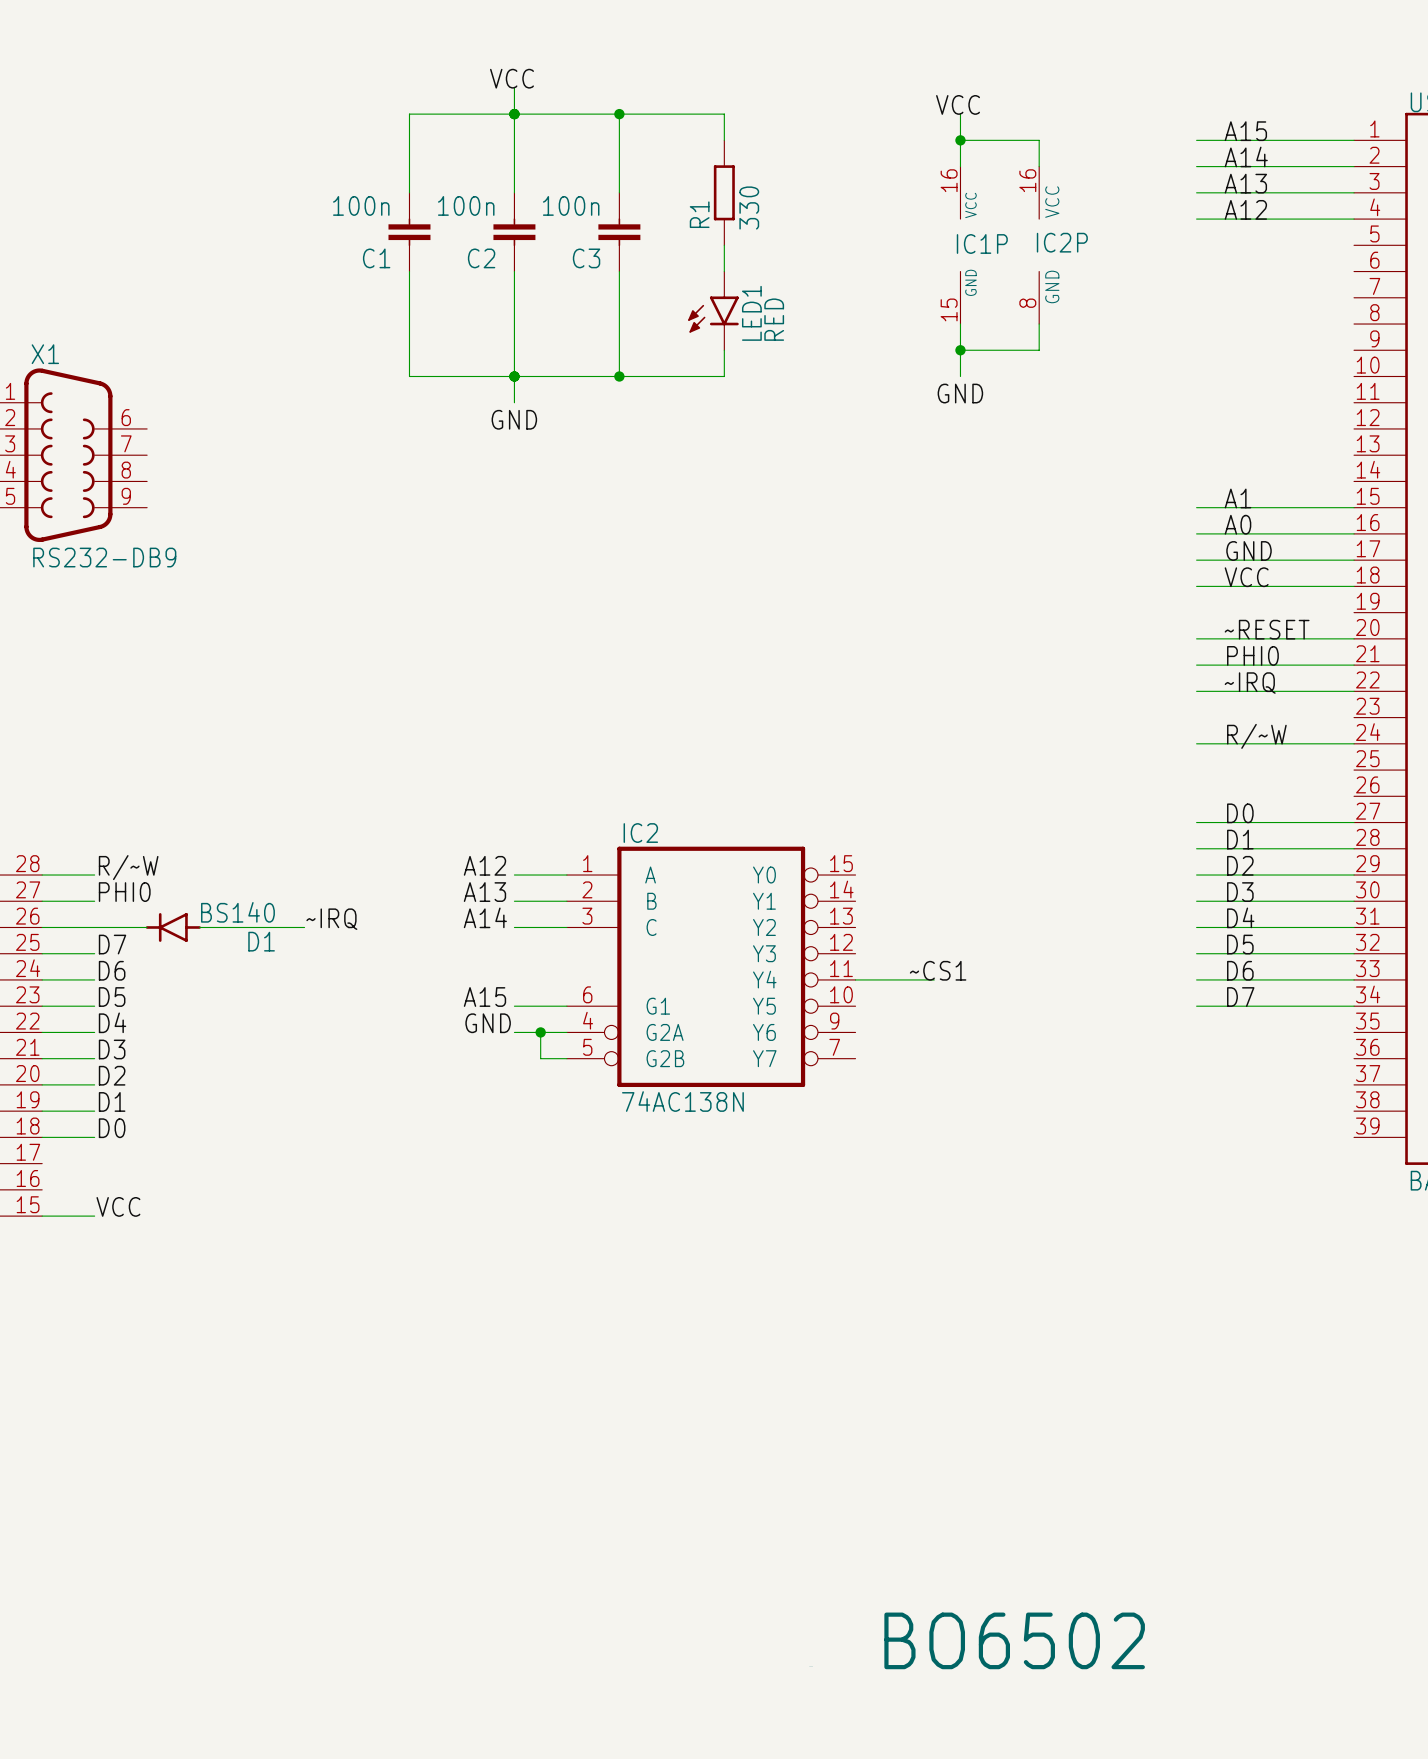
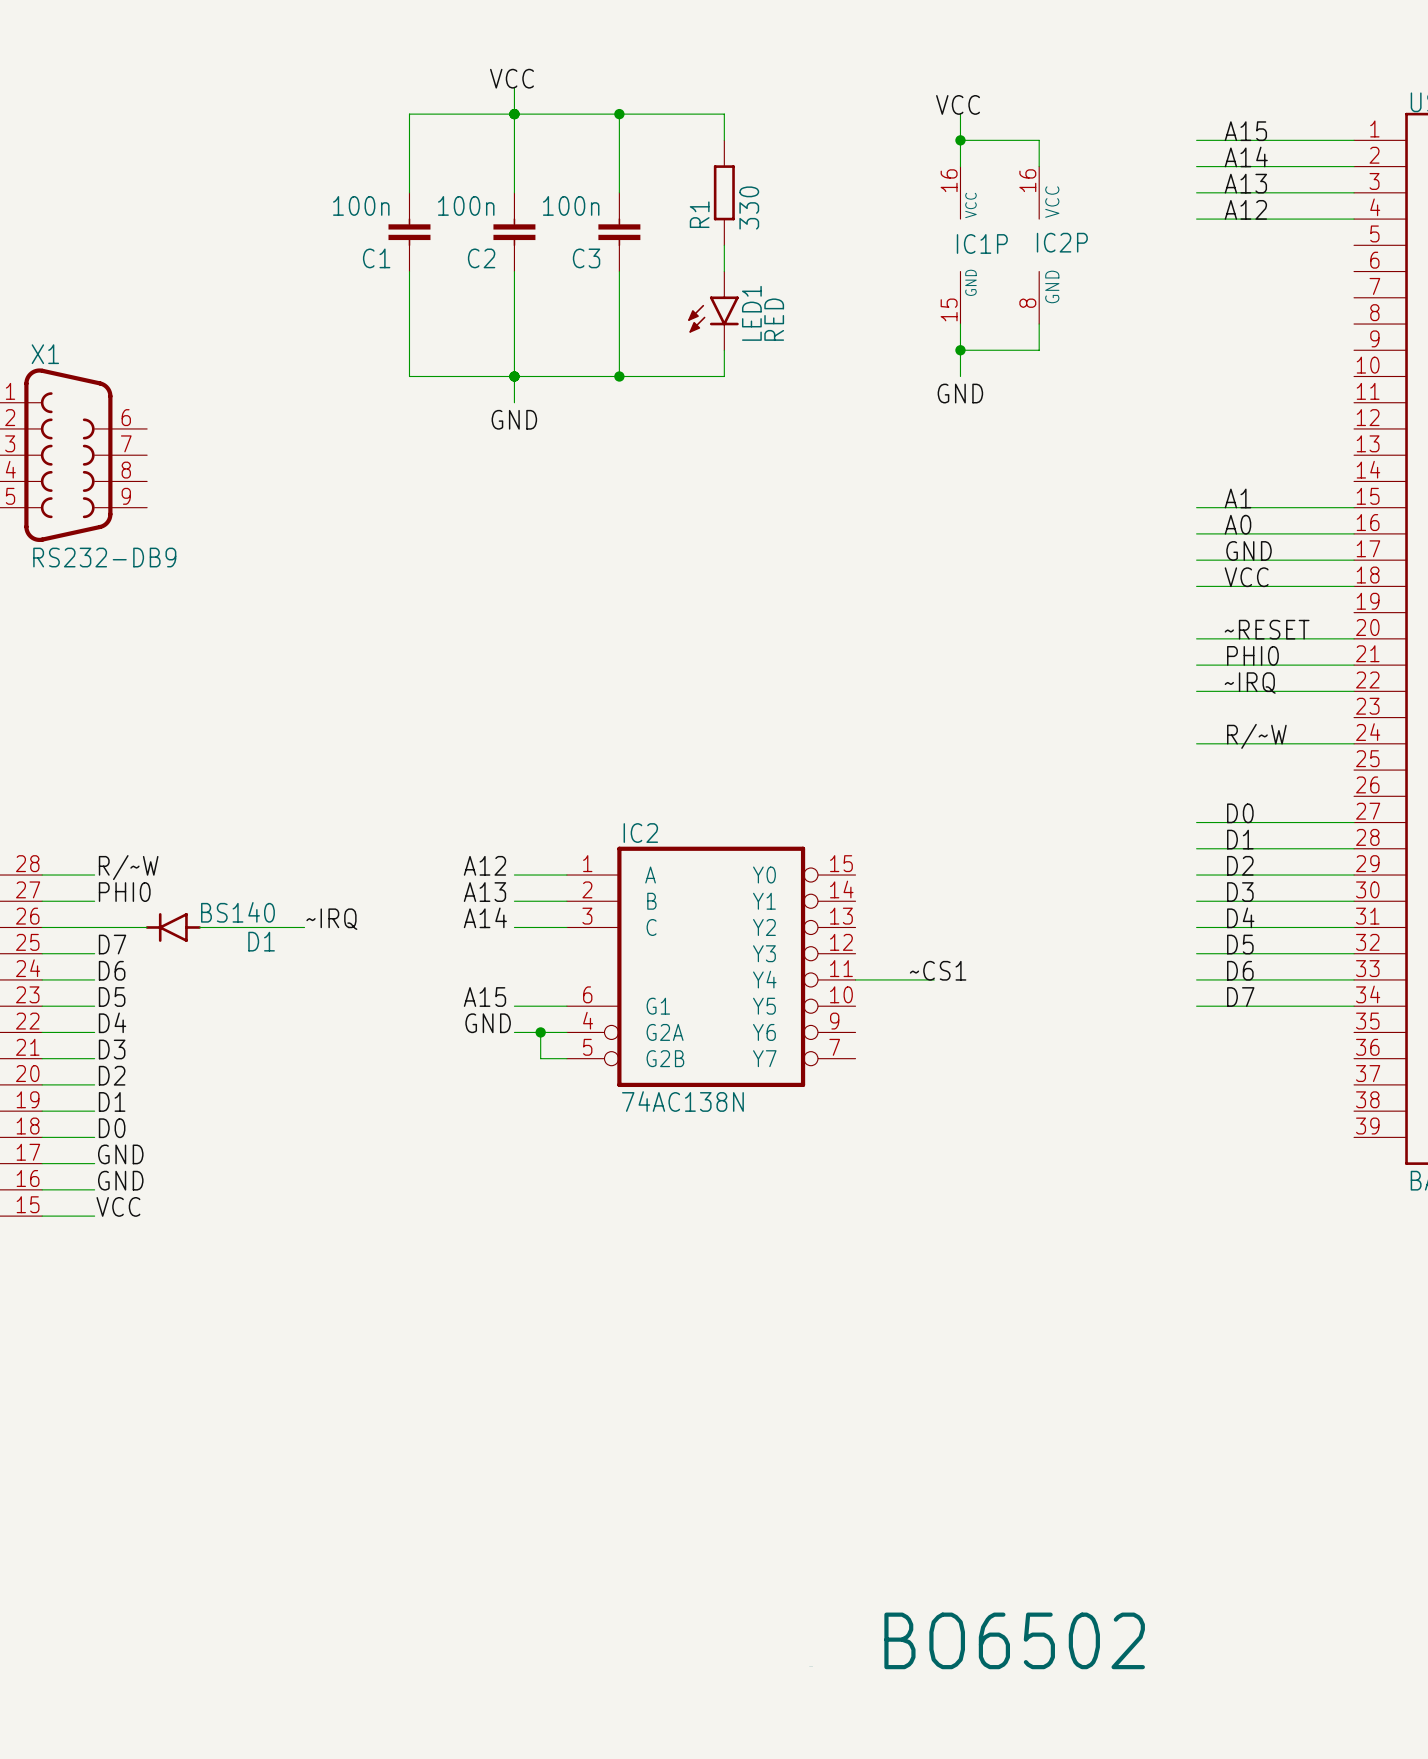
label: none -> GND (120, 1154)
wire: none -> (42, 1163) (94, 1163)
label: none -> GND (120, 1180)
wire: none -> (42, 1189) (94, 1189)

